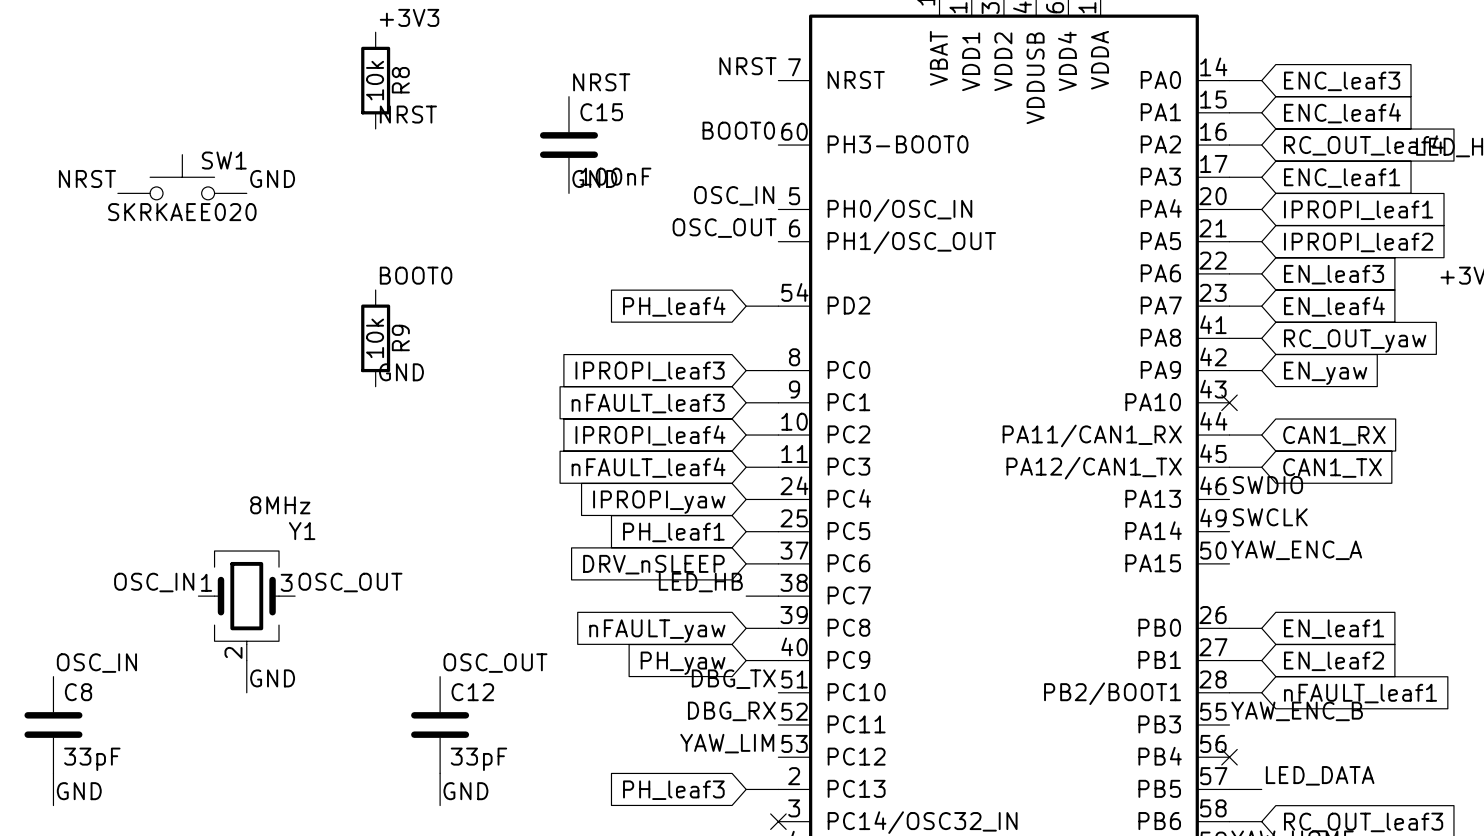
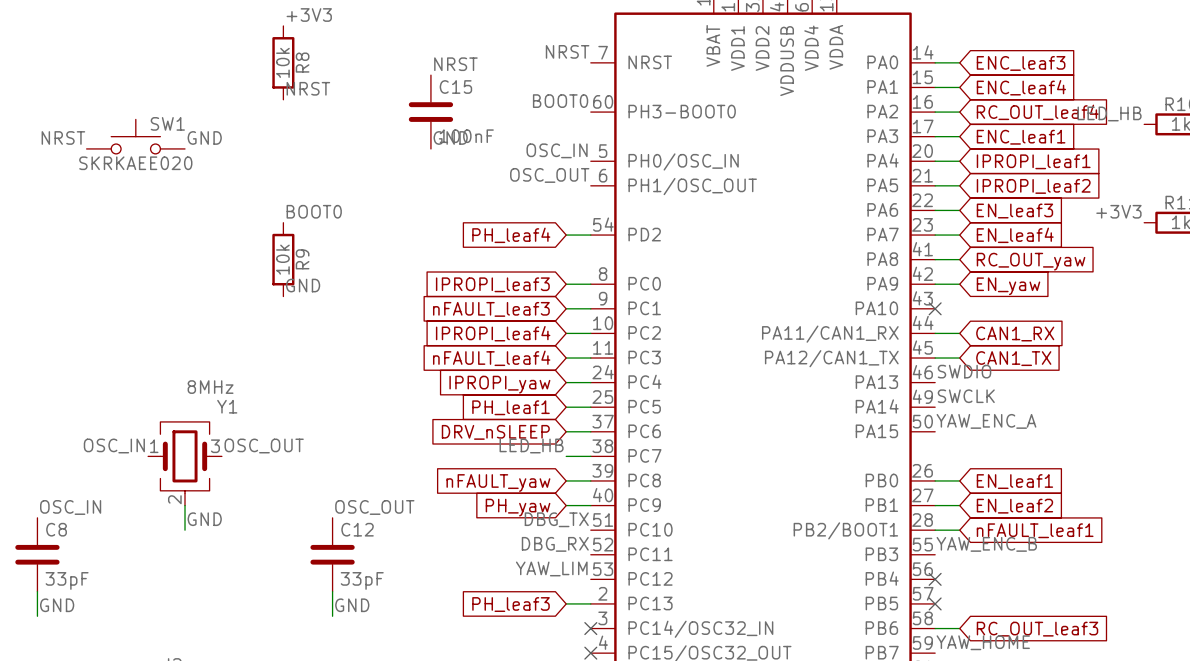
label: LED_DATA (1320, 775) -> none
wire: (1229, 789) (1261, 789) -> none
no-connect mark: none -> (935, 603)

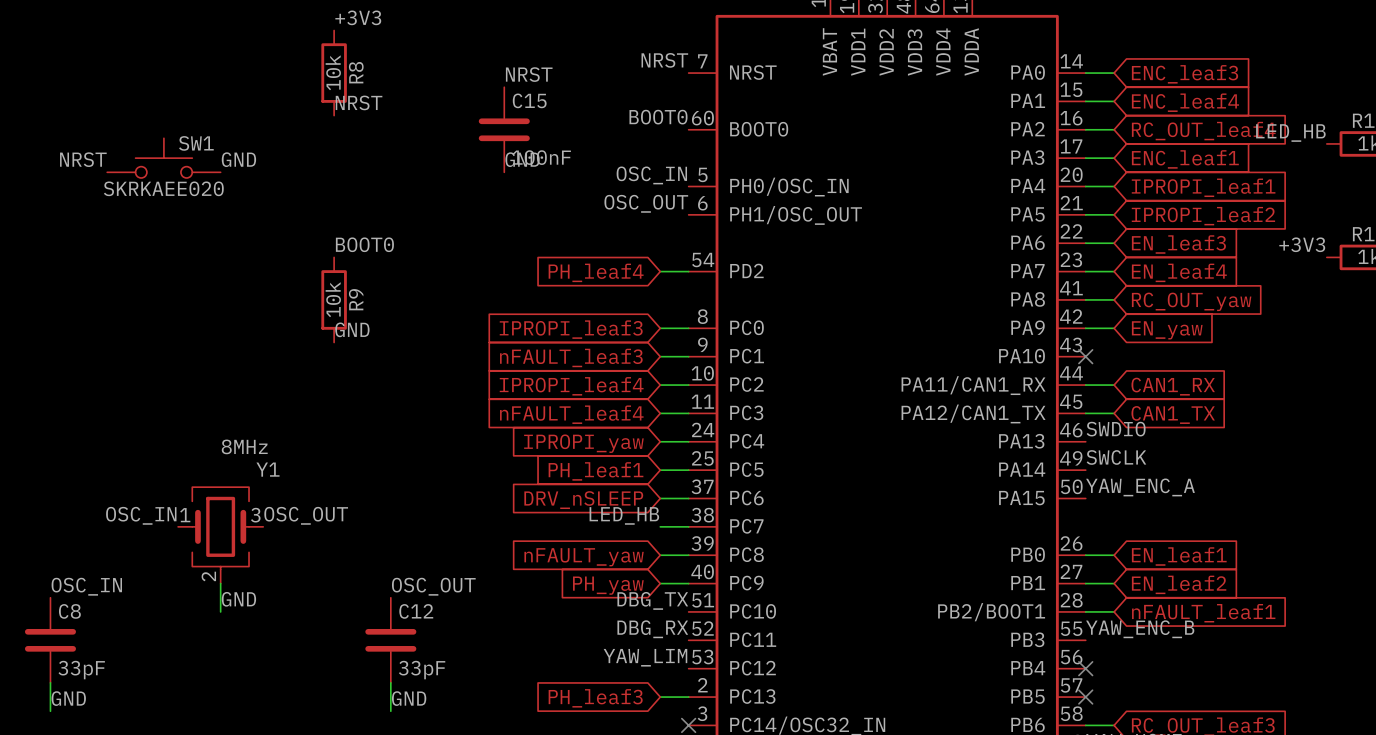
part pin name: VDDUSB (787, 61) -> VDD3 (915, 52)
part pin name: PH3-BOOT0 (682, 111) -> BOOT0 (759, 129)

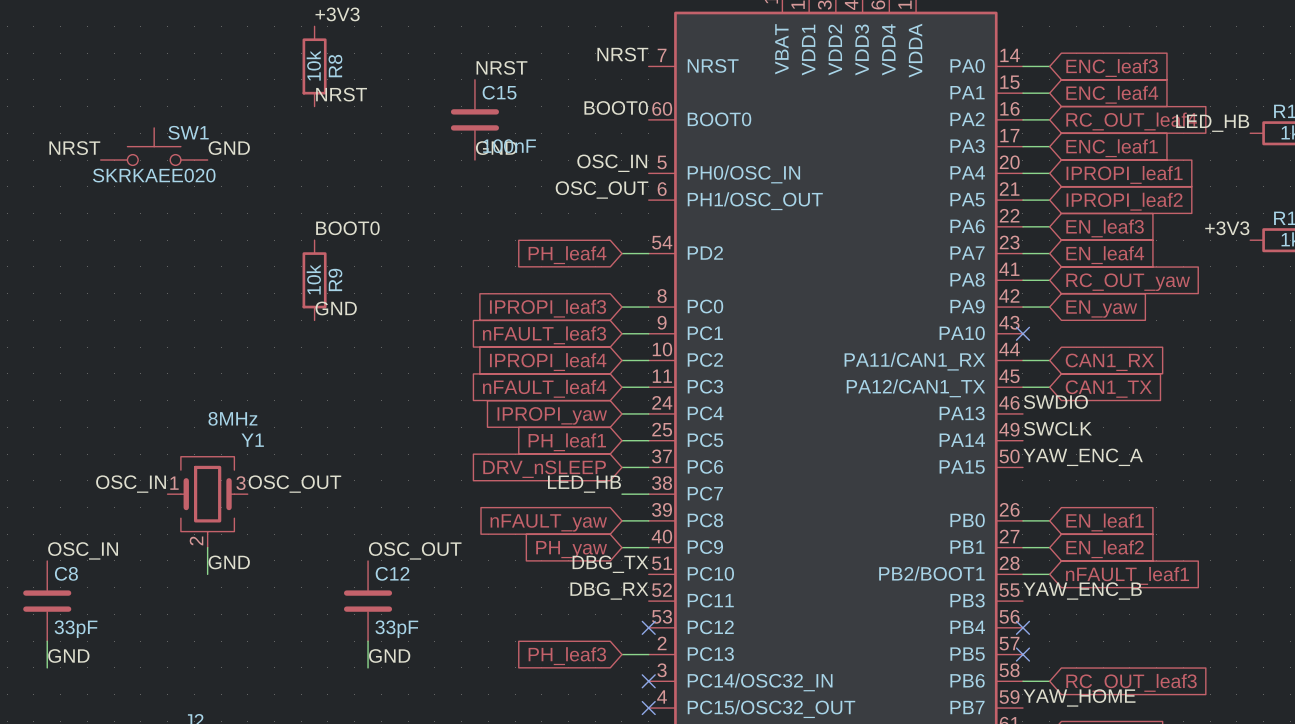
label: YAW_LIM (645, 657) -> none
no-connect mark: none -> (648, 627)

